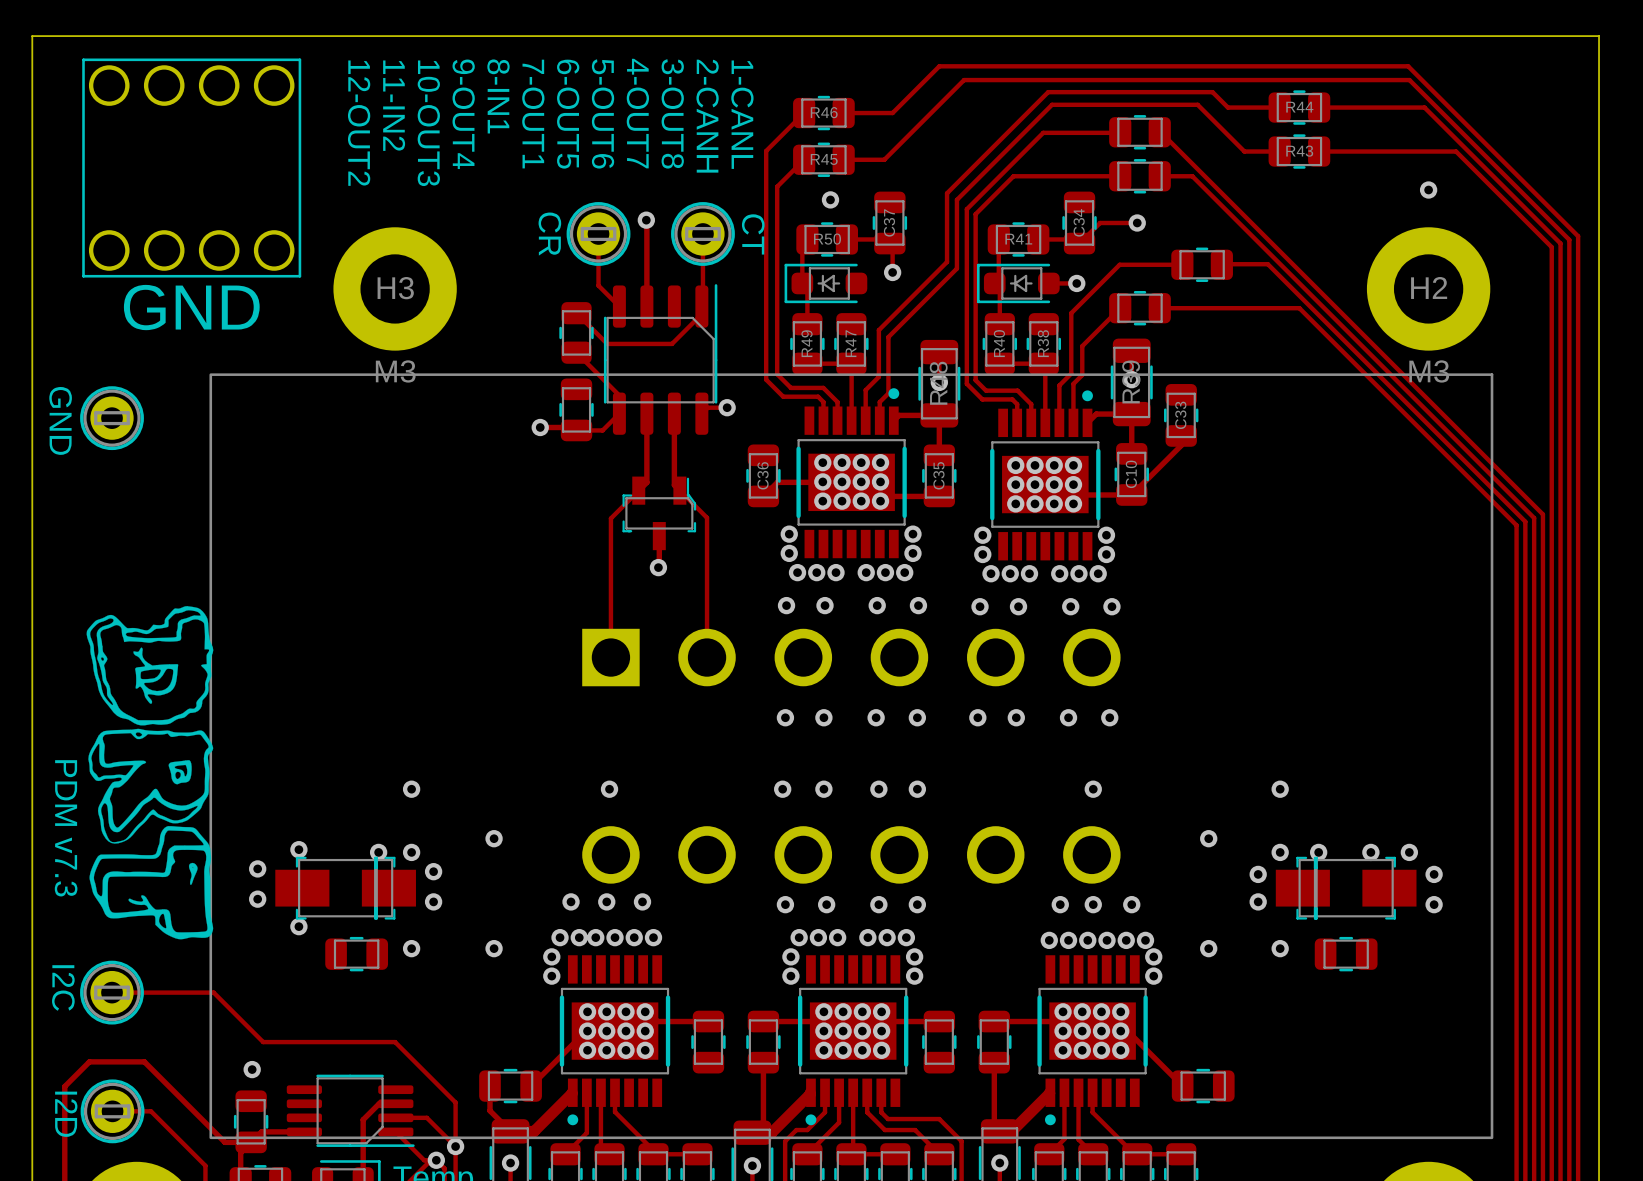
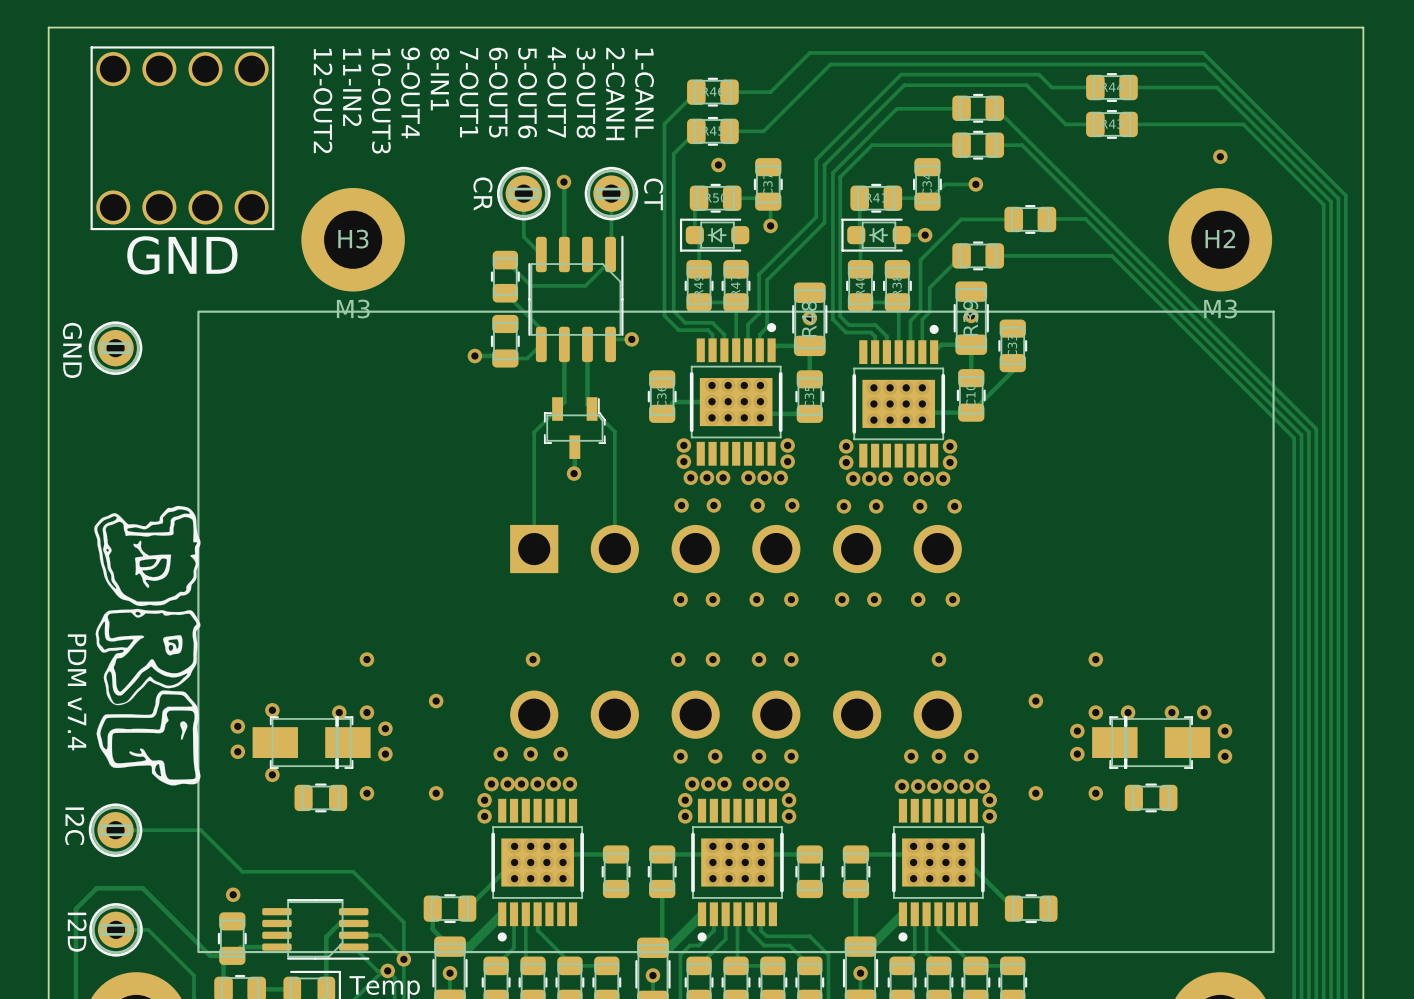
text: PDM v7.3 (66, 828) -> PDM v7.4 (77, 692)

